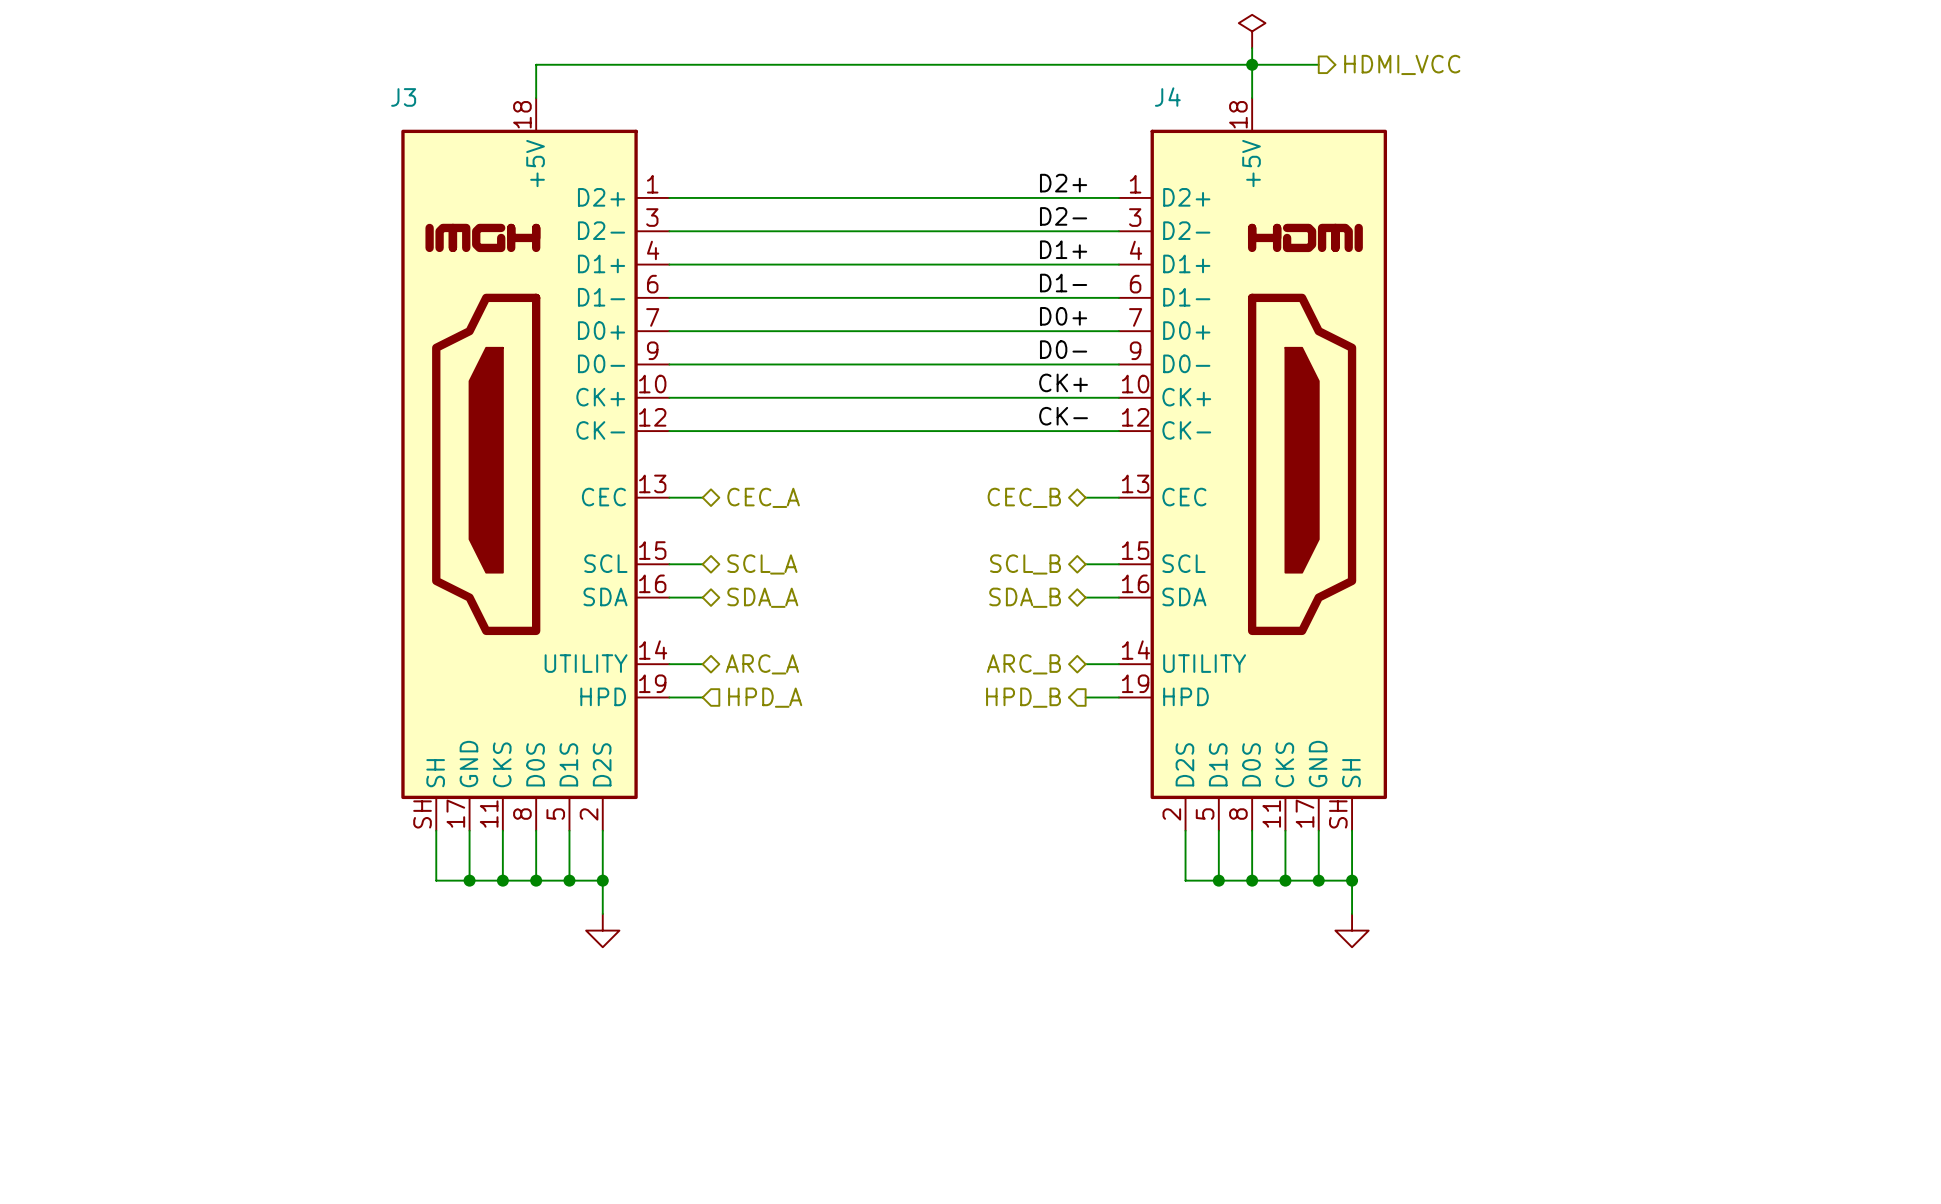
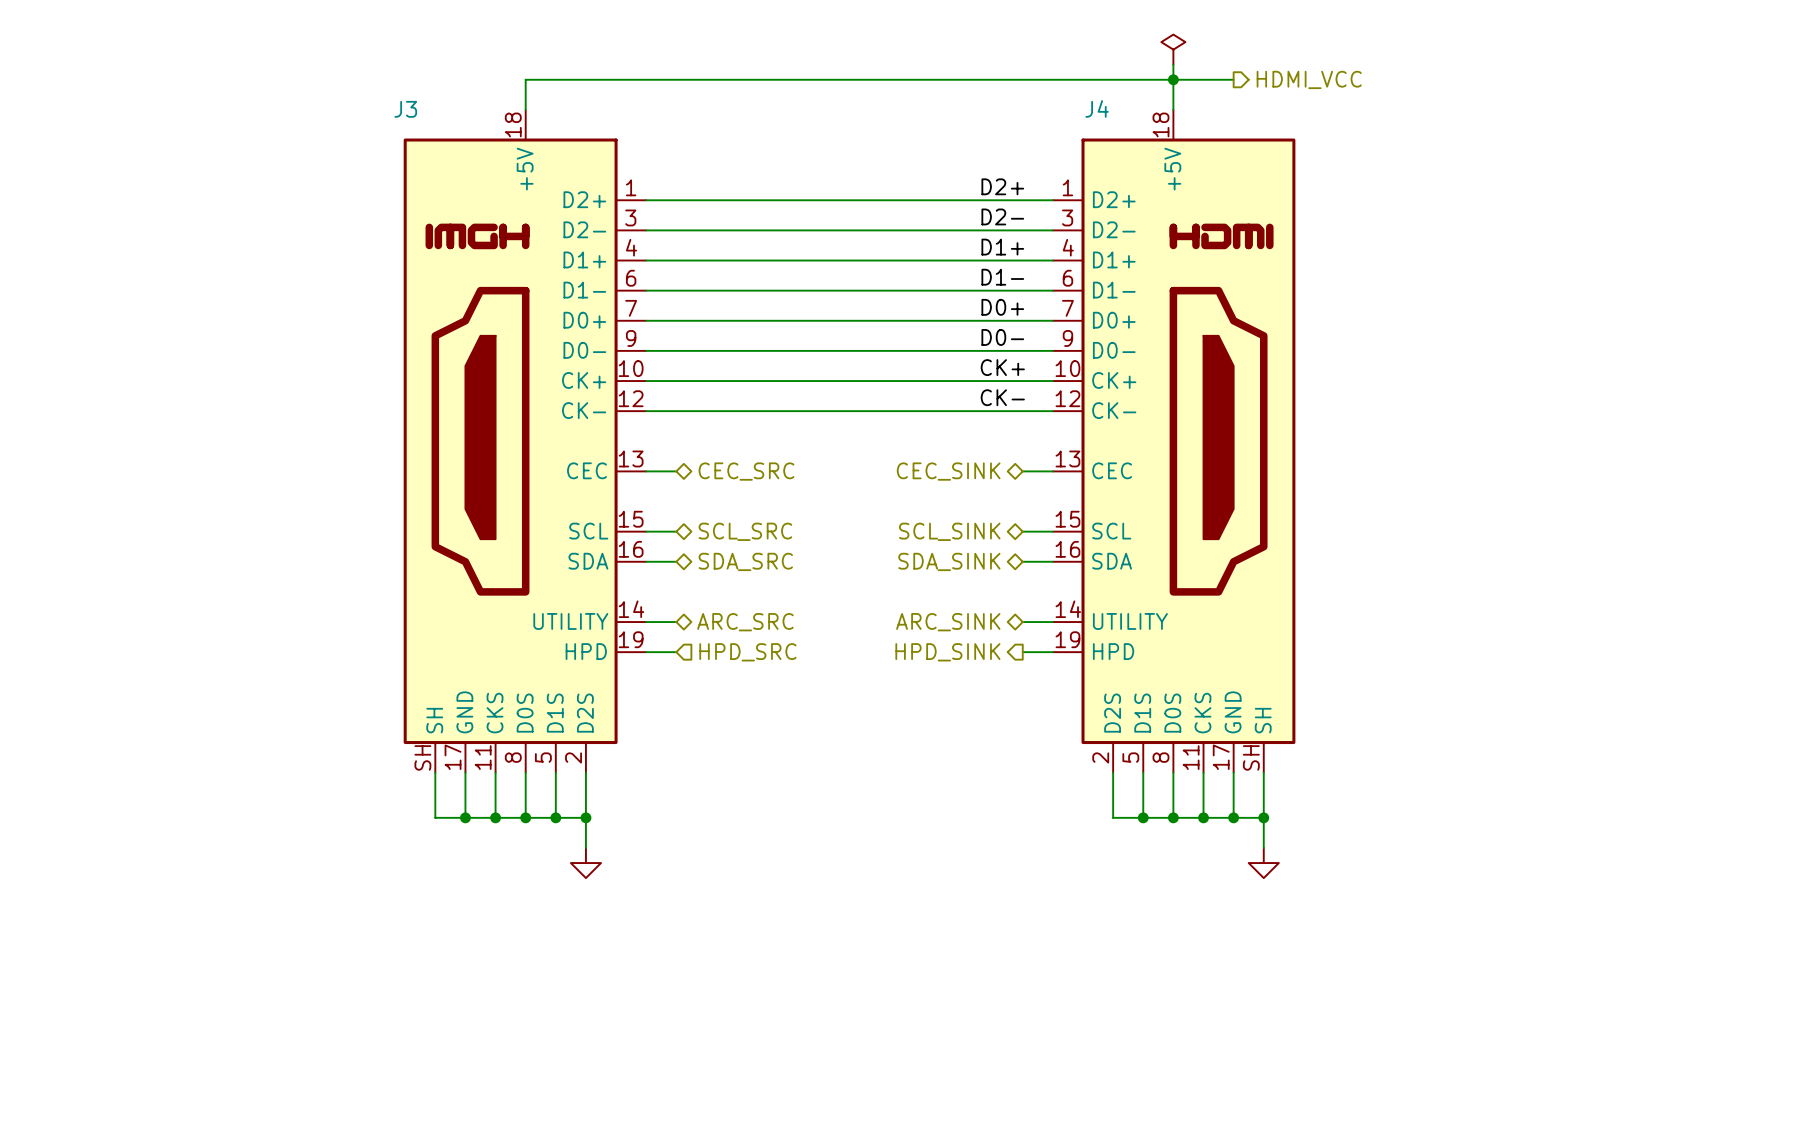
hierarchical label: CEC_A (763, 497) -> CEC_SRC (746, 471)
hierarchical label: CEC_B (1024, 497) -> CEC_SINK (948, 471)
hierarchical label: SCL_A (762, 564) -> SCL_SRC (745, 531)
hierarchical label: SCL_B (1025, 564) -> SCL_SINK (949, 531)
hierarchical label: SDA_A (762, 597) -> SDA_SRC (745, 561)
hierarchical label: SDA_B (1025, 597) -> SDA_SINK (949, 561)
hierarchical label: ARC_A (762, 664) -> ARC_SRC (745, 622)
hierarchical label: ARC_B (1023, 664) -> ARC_SINK (948, 622)
hierarchical label: HPD_A (765, 697) -> HPD_SRC (747, 652)
hierarchical label: HPD_B (1023, 697) -> HPD_SINK (947, 652)

